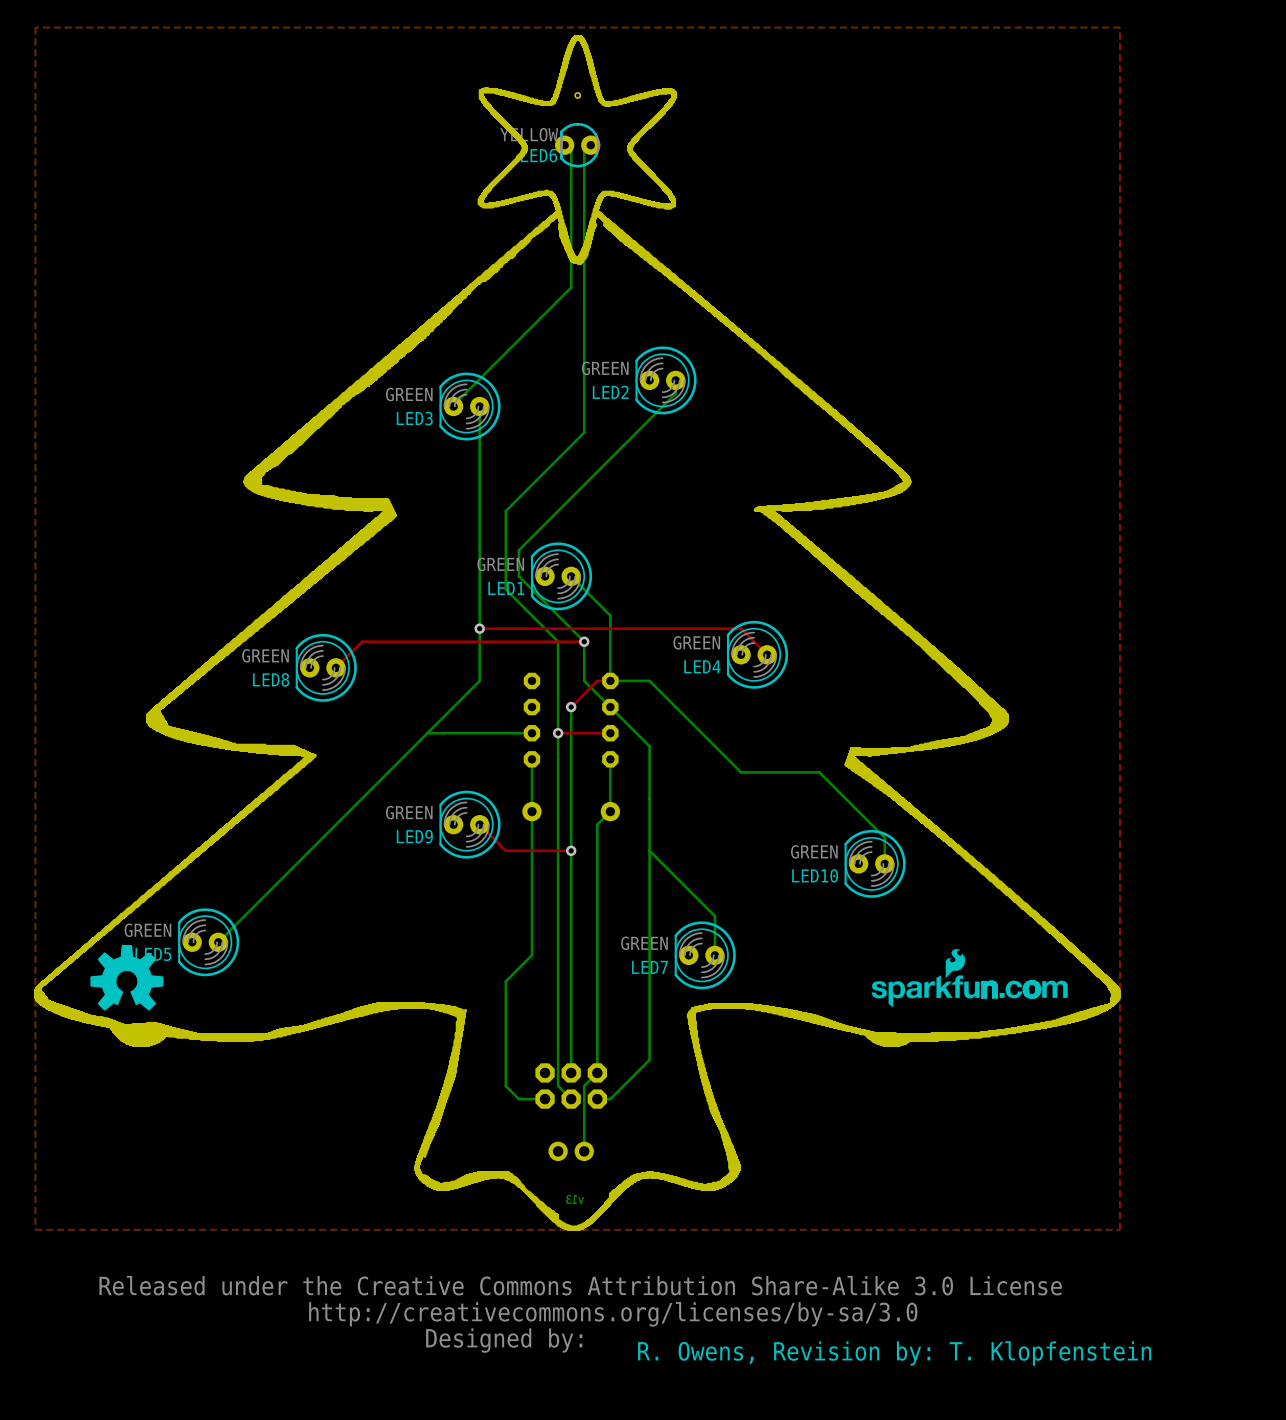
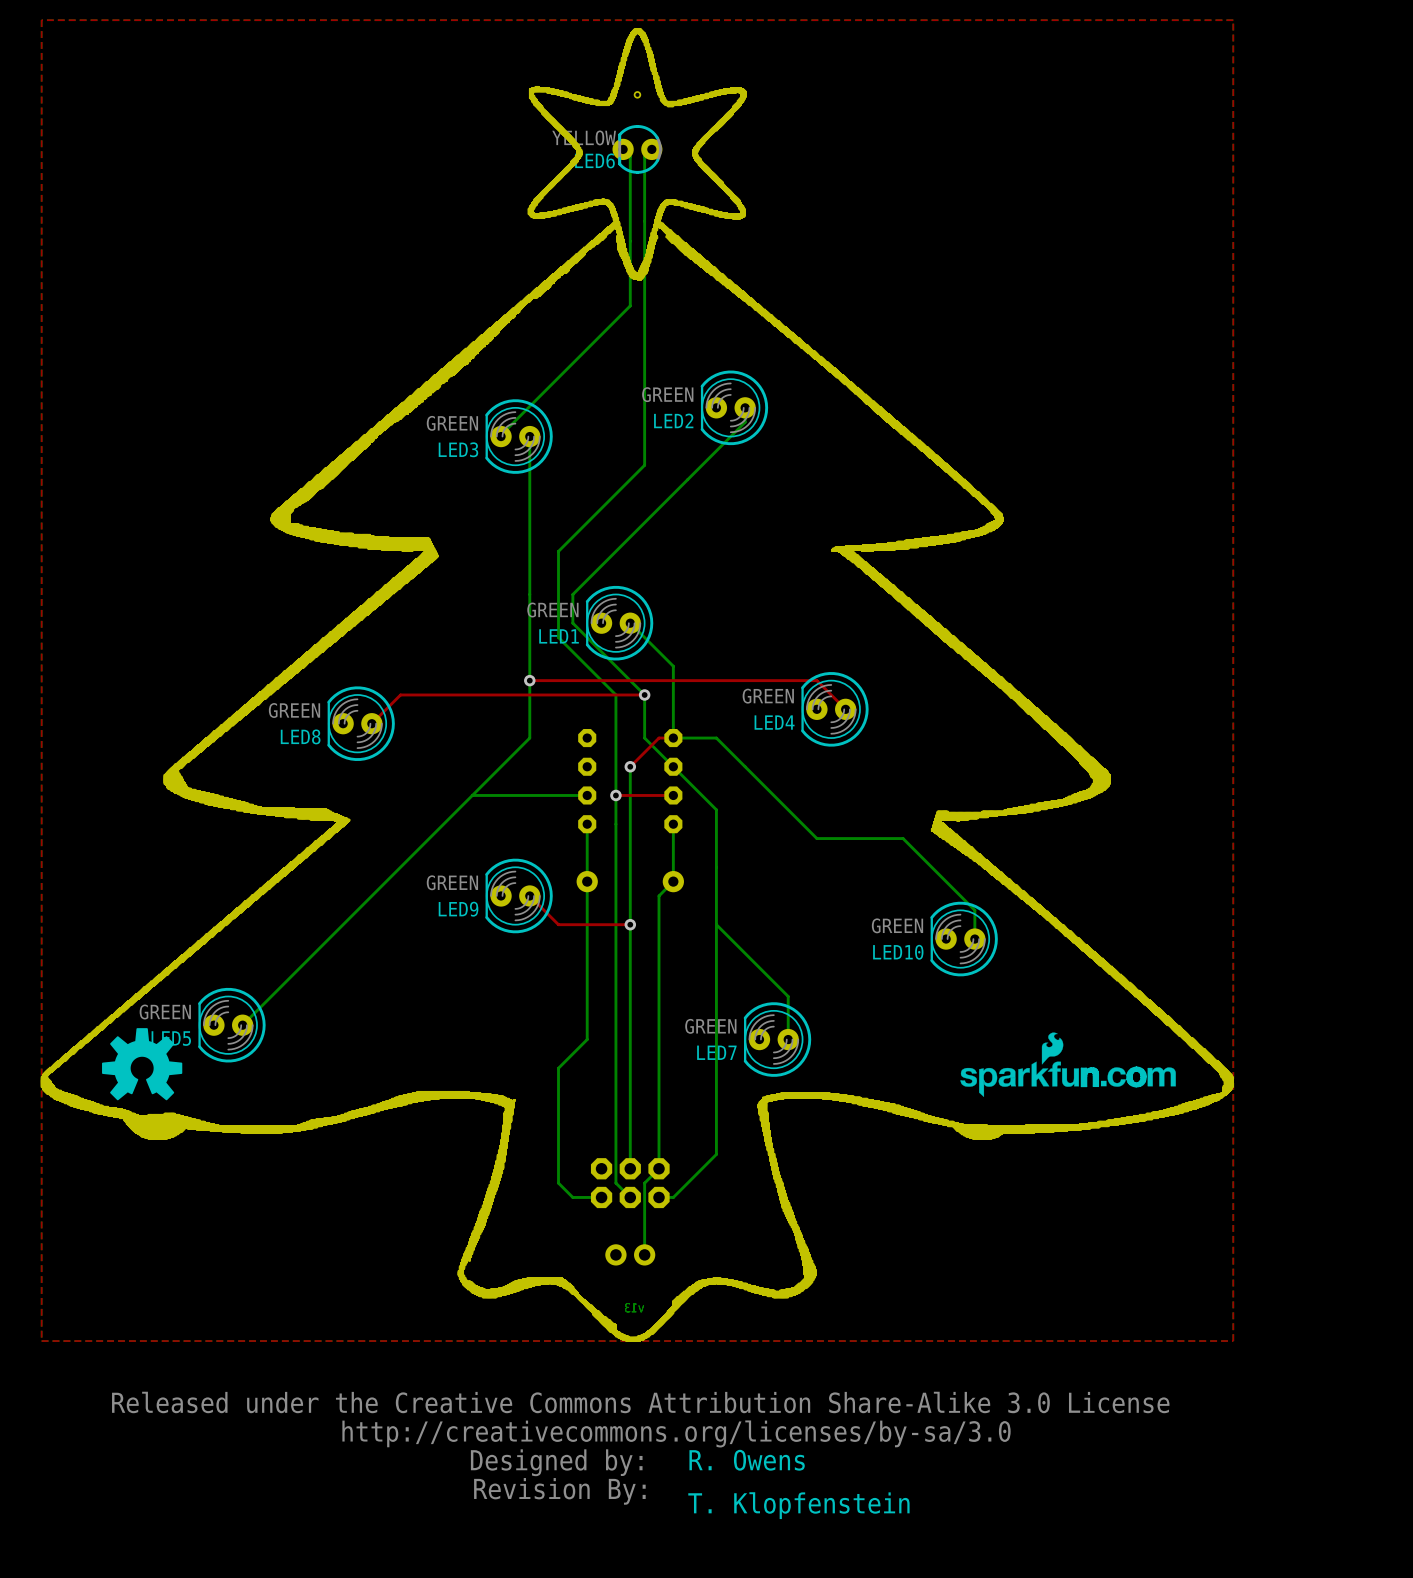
text: none -> R. Owens (747, 1460)
text: R. Owens, Revision by: T. Klopfenstein (894, 1353) -> none
drawing: none -> [474, 1478, 646, 1505]
text: none -> T. Klopfenstein (798, 1505)

